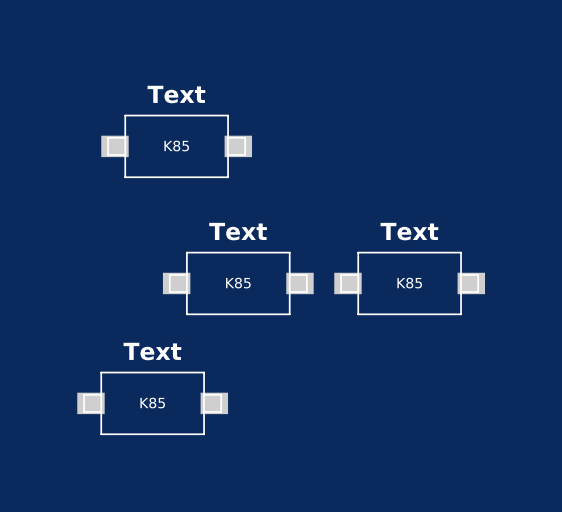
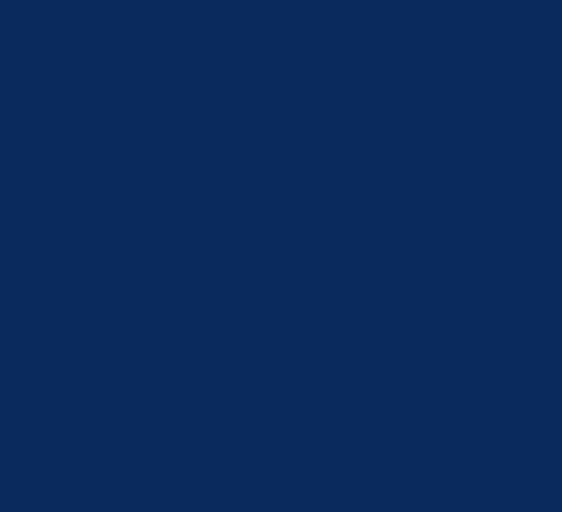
K85: (176, 146) -> none
K85: (238, 283) -> none
K85: (409, 283) -> none
K85: (152, 403) -> none

